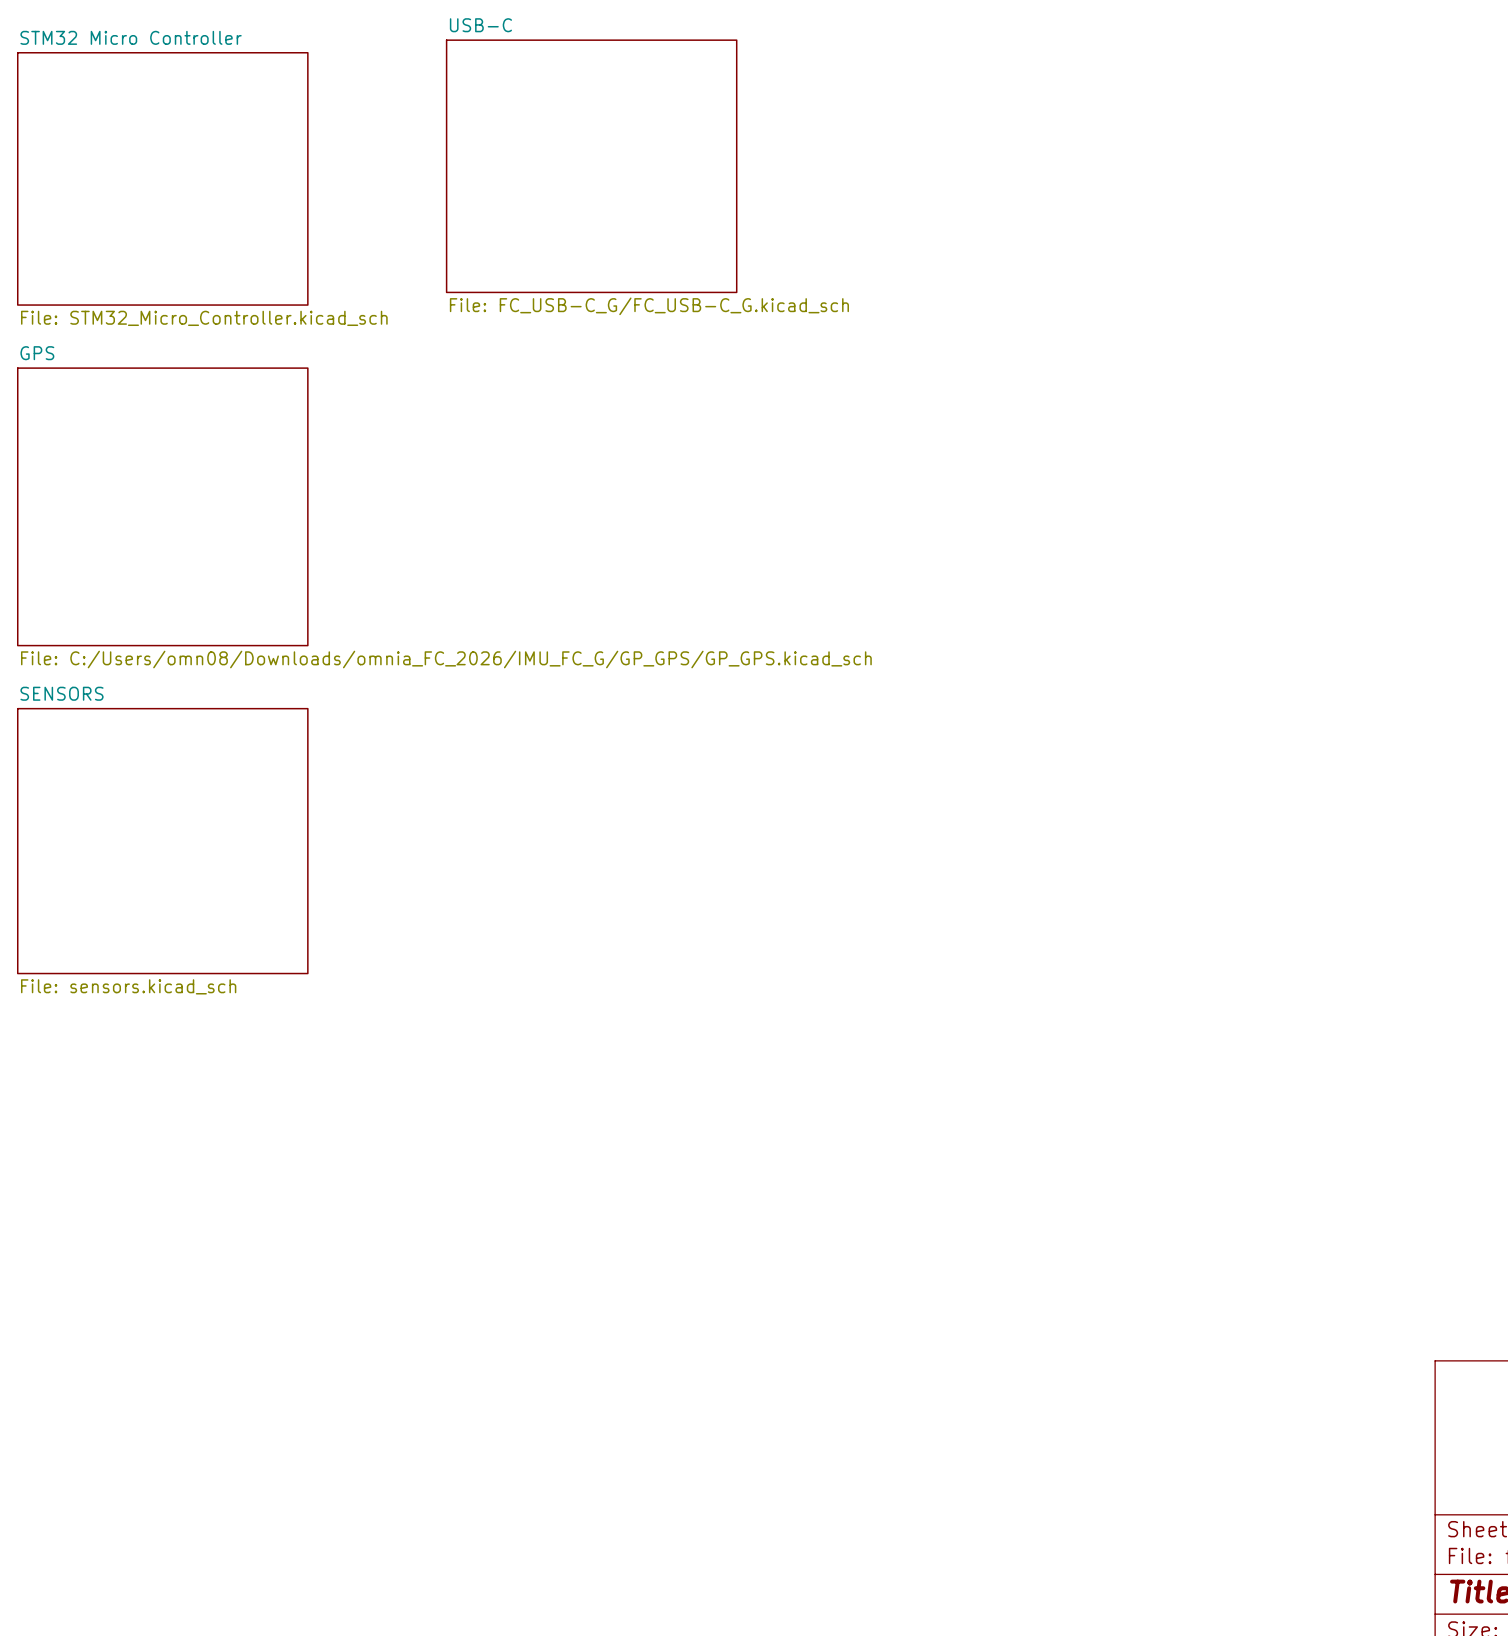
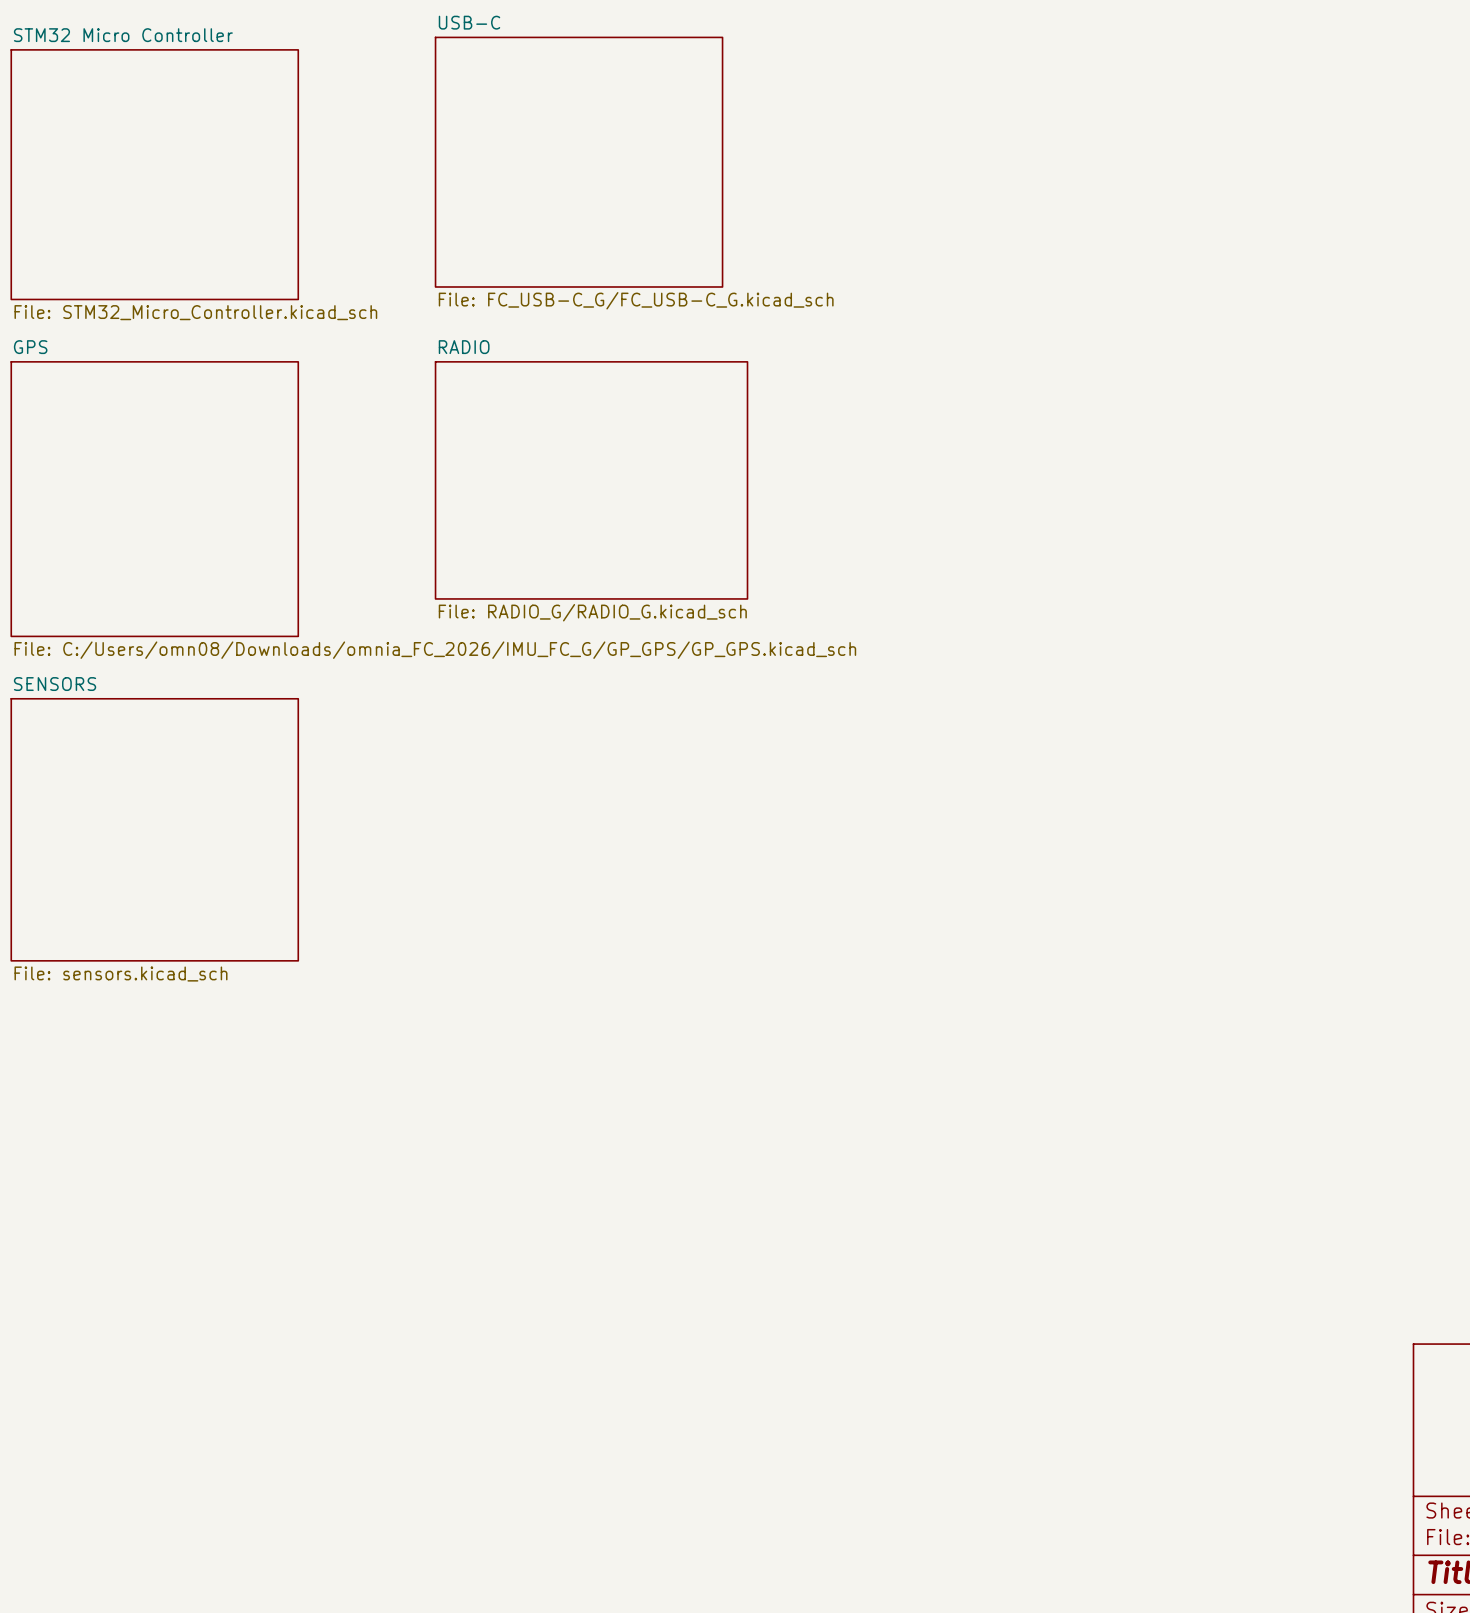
sheet RADIO: none -> File: RADIO_G/RADIO_G.kicad_sch (591, 480)

